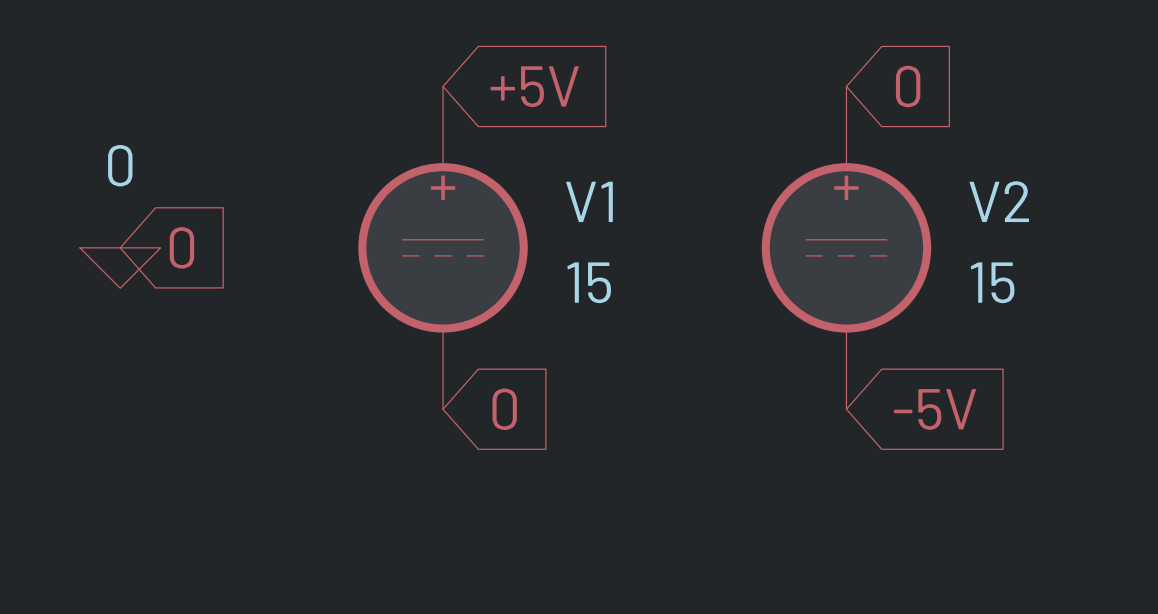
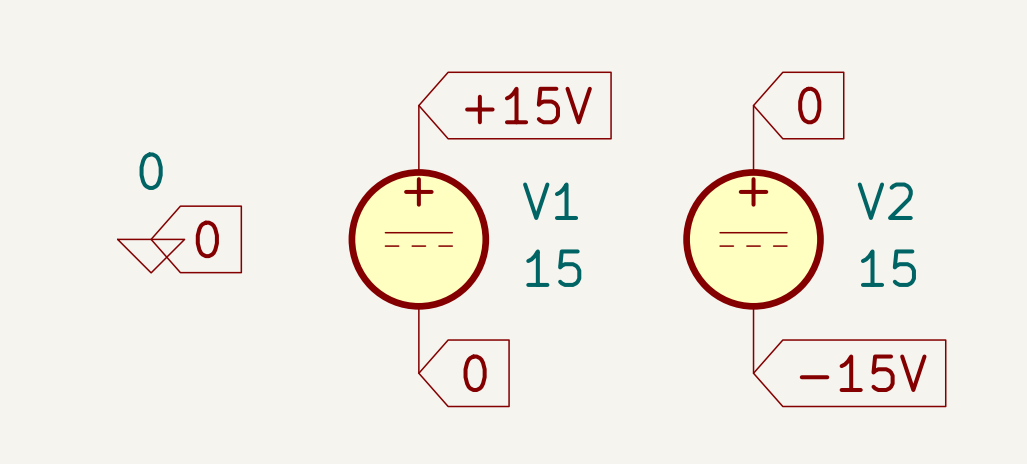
global label: +5V (534, 86) -> +15V (528, 105)
global label: -5V (935, 409) -> -15V (863, 373)

